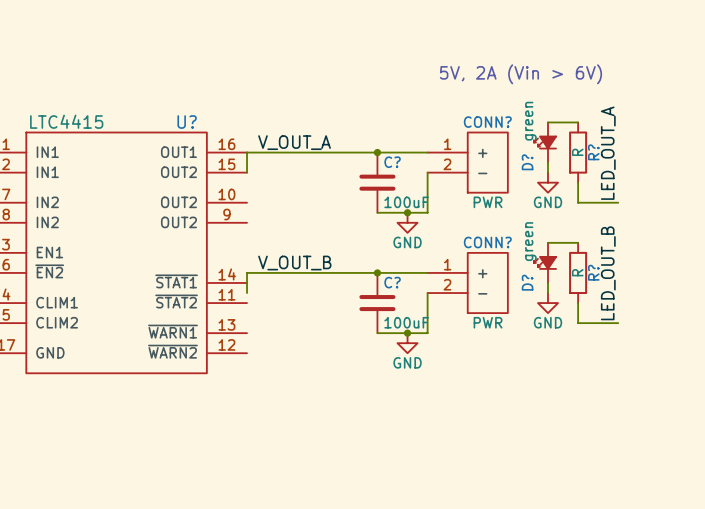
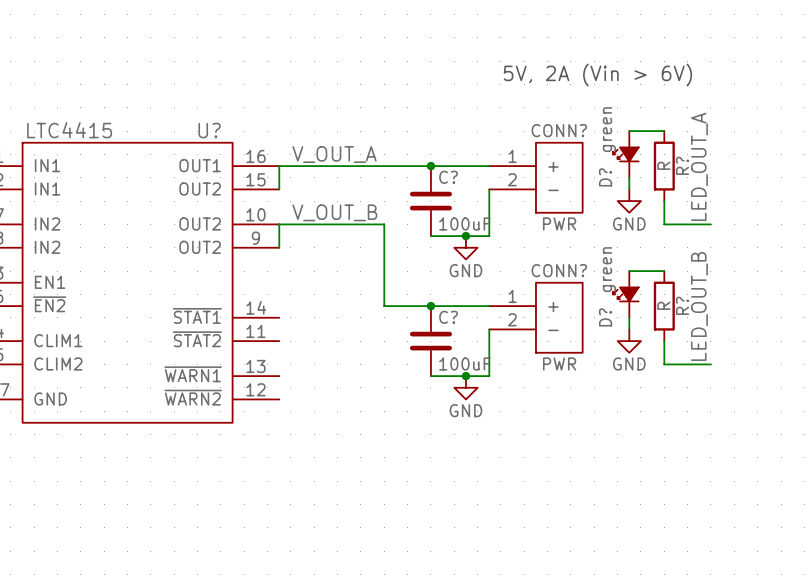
label position: V_OUT_B (294, 263) -> V_OUT_B (334, 212)
wire: (337, 272) (247, 272) (247, 293) -> (384, 306) (384, 224) (279, 224) (279, 247)

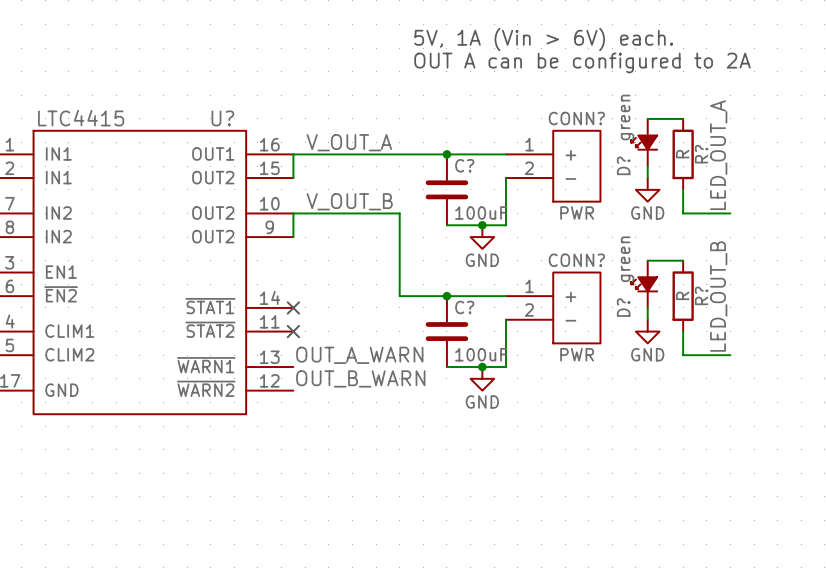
text: none -> OUT A can be configured to 2A (582, 62)
text: 5V, 2A (Vin > 6V) (597, 75) -> 5V, 1A (Vin > 6V) each. (543, 39)
no-connect mark: none -> (293, 307)
no-connect mark: none -> (293, 331)
label: none -> OUT_A_WARN (359, 355)
label: none -> OUT_B_WARN (360, 378)

